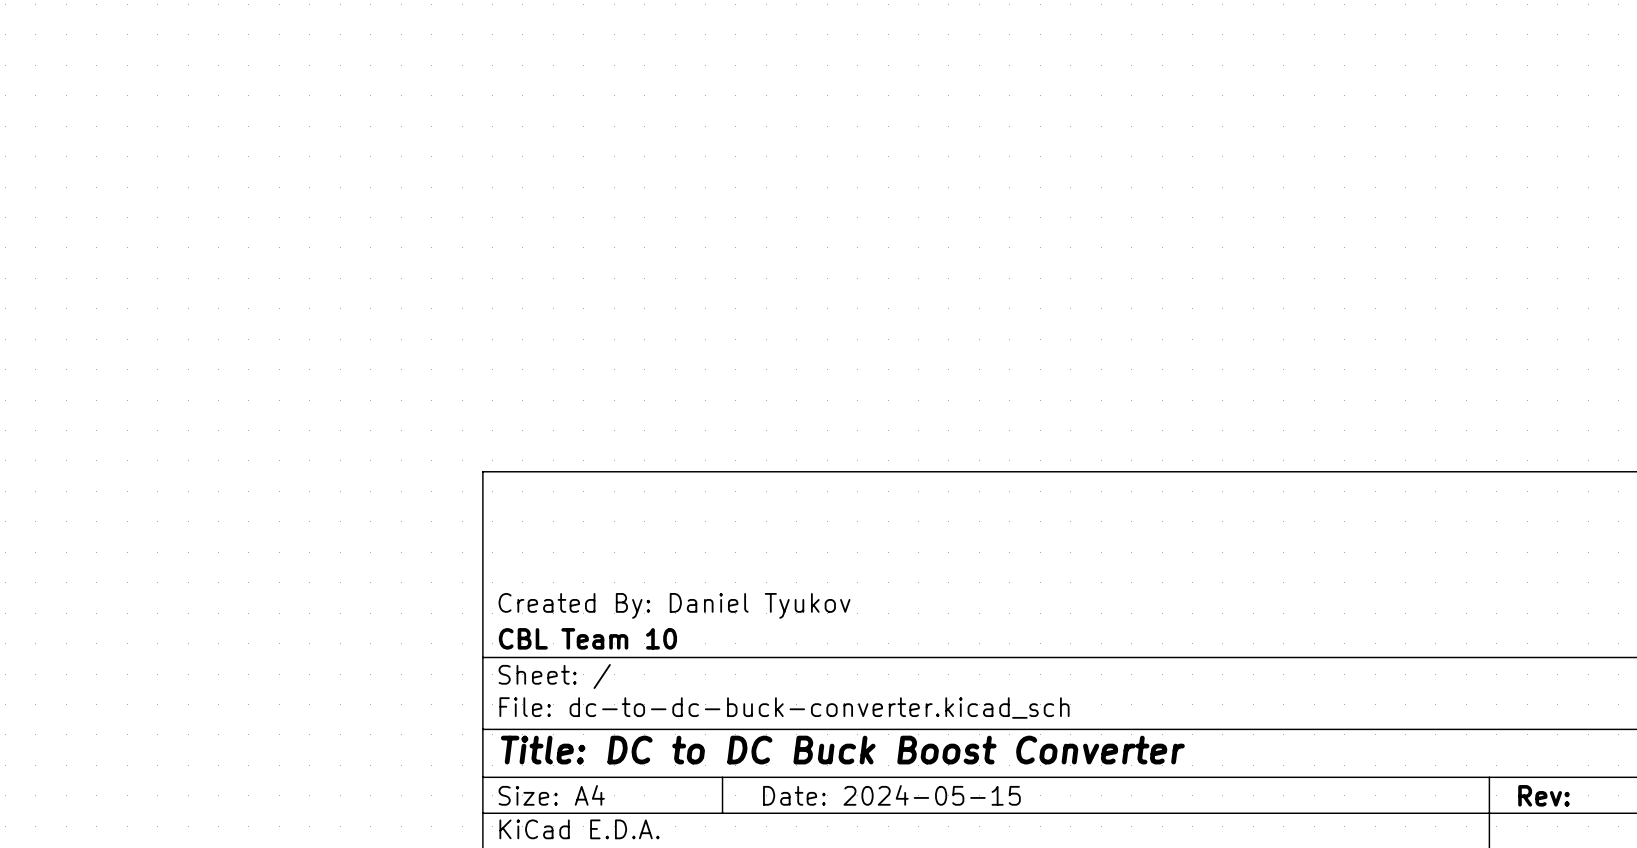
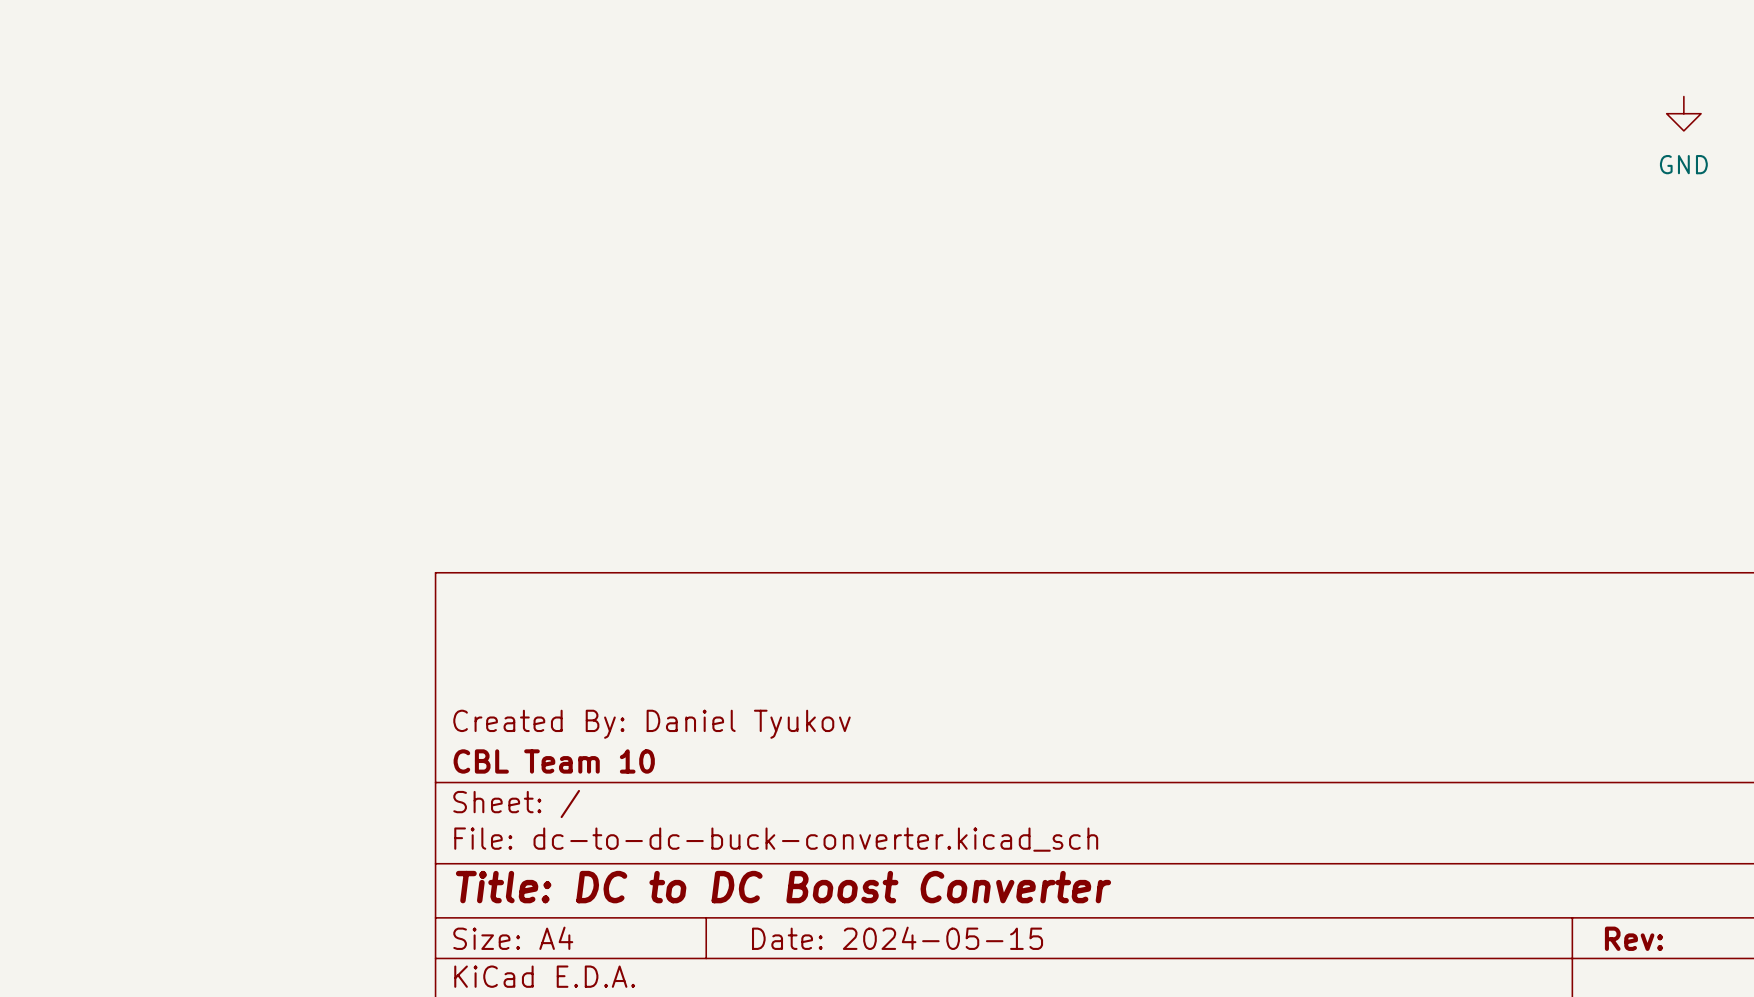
power symbol: none -> GND (1683, 113)
title block: Title: DC to DC Buck Boost Converter (842, 750) -> Title: DC to DC Boost Converter (783, 887)

